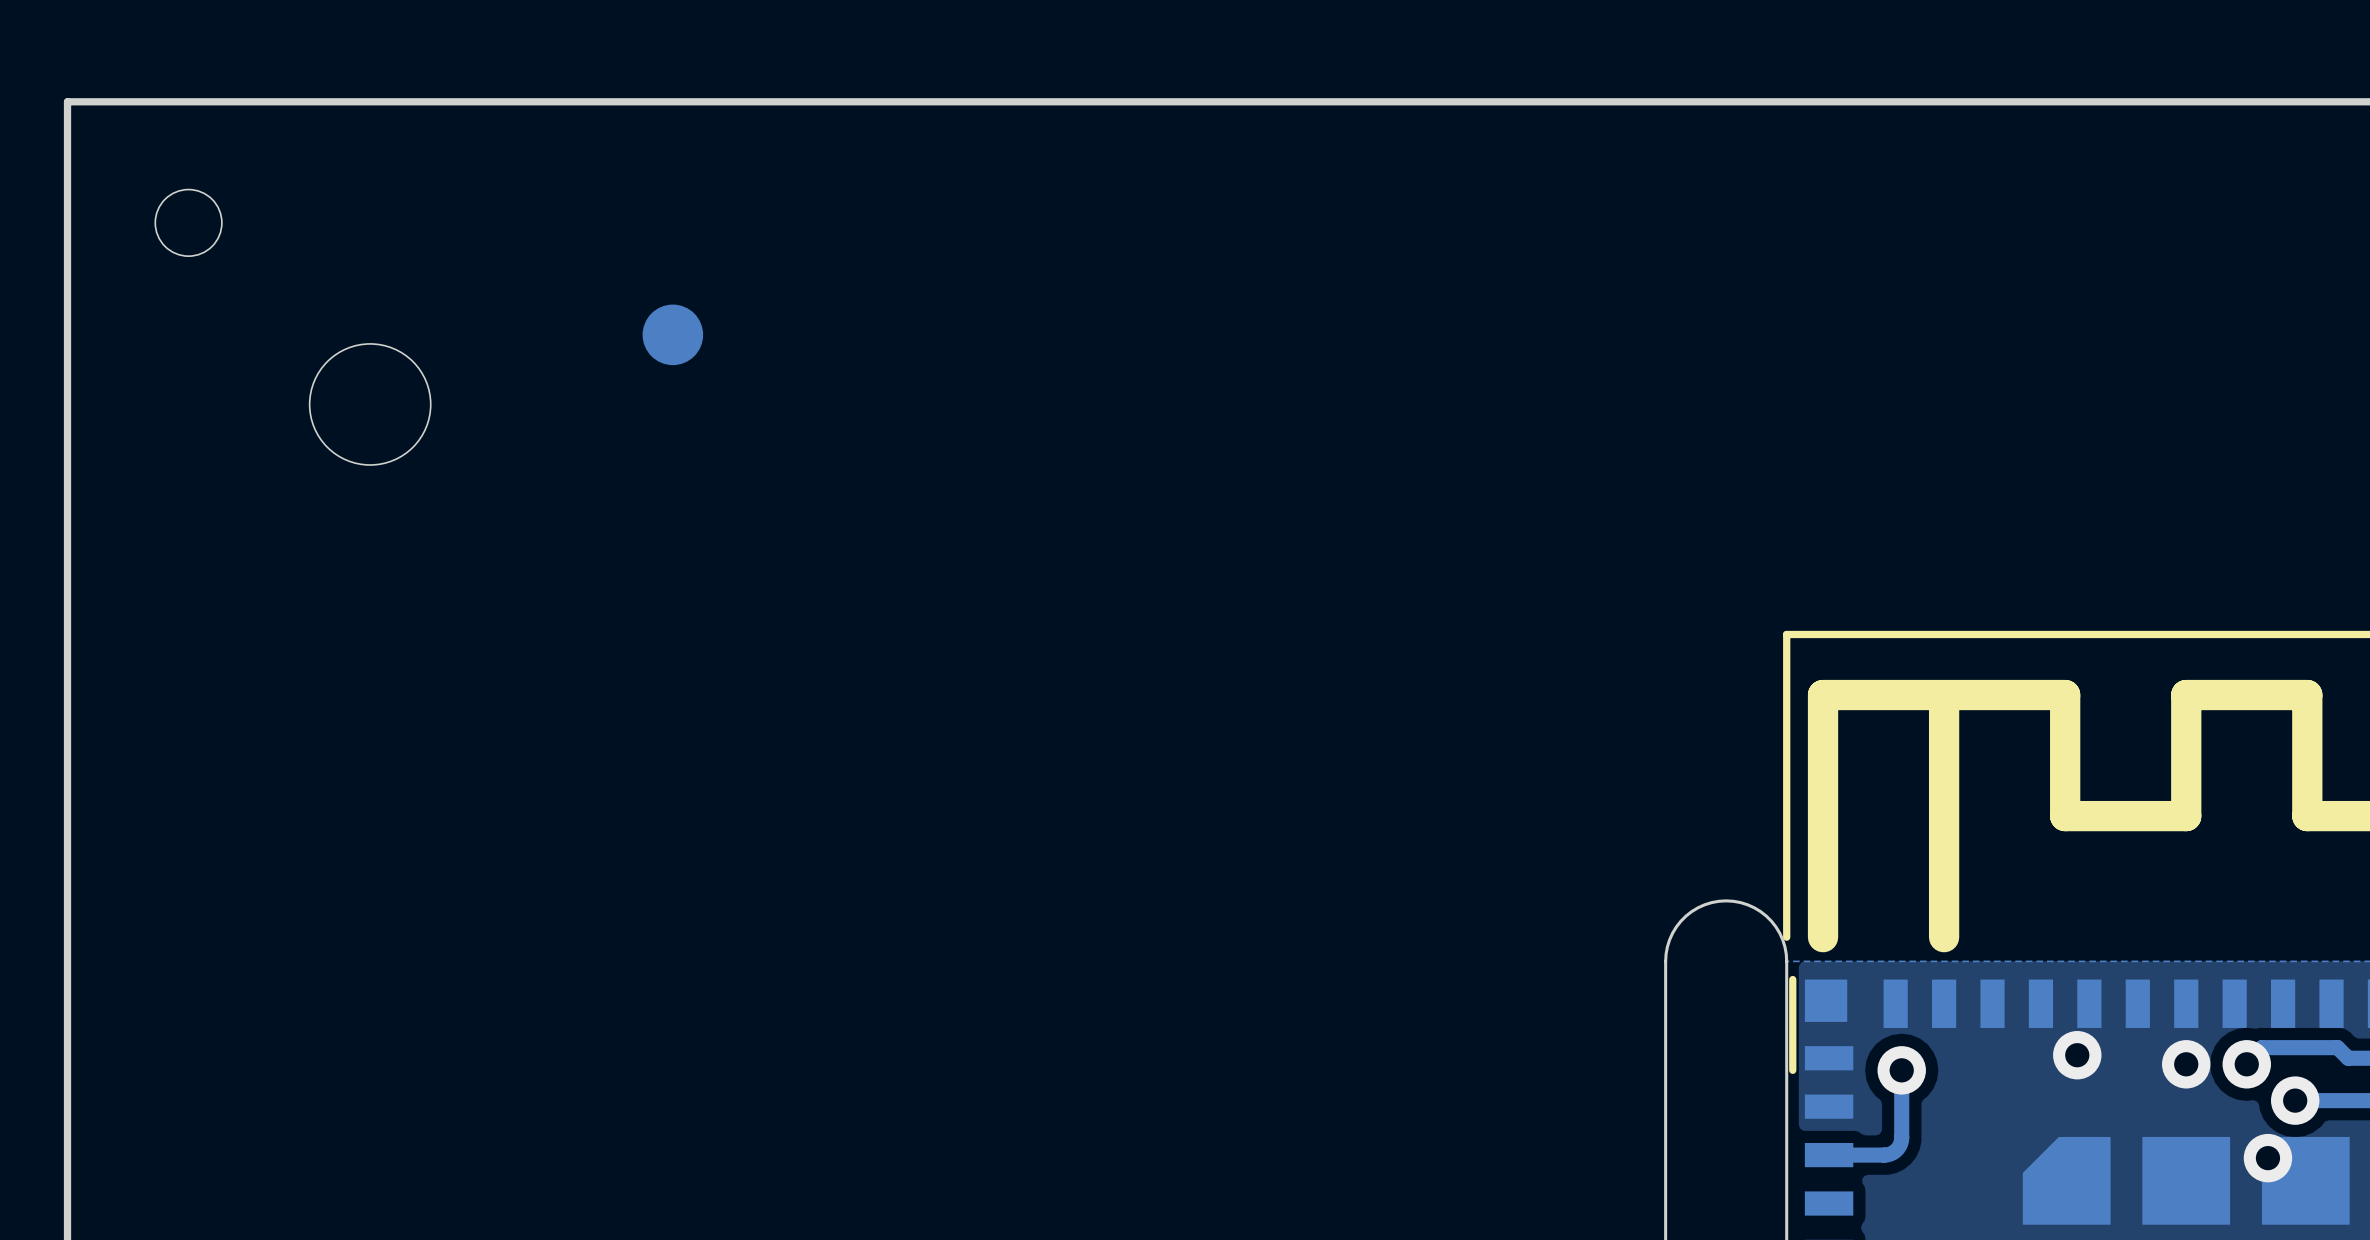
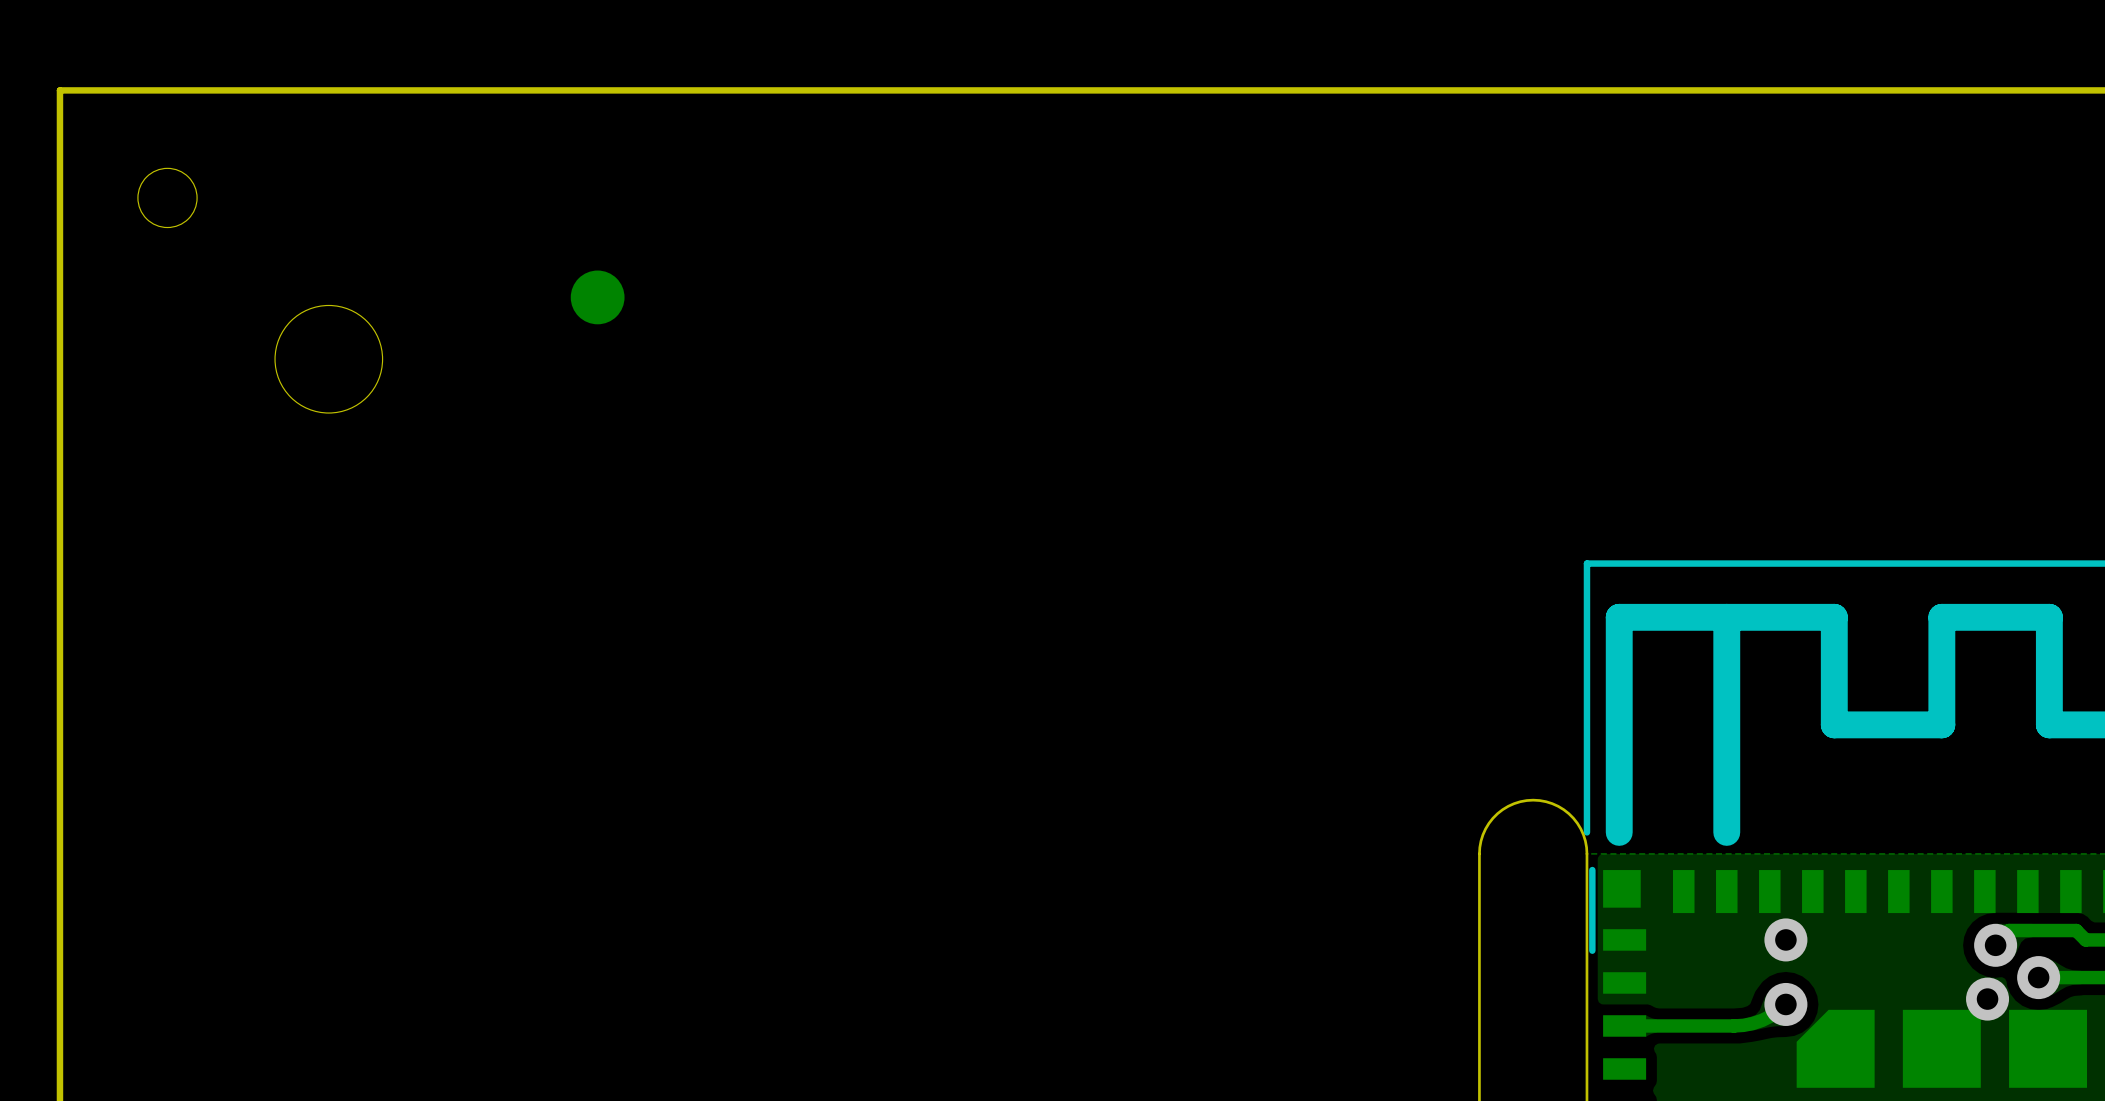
via: (2077, 1055) -> none
via: none -> (1785, 939)
via: (2186, 1064) -> none
track: (1901, 1070) (1901, 1141) (1895, 1151) (1884, 1155) -> (1785, 1004) (1770, 1016) (1743, 1025) (1673, 1025)
via: (1901, 1070) -> none
via: none -> (1785, 1004)
via position: (2267, 1158) -> (1987, 999)

